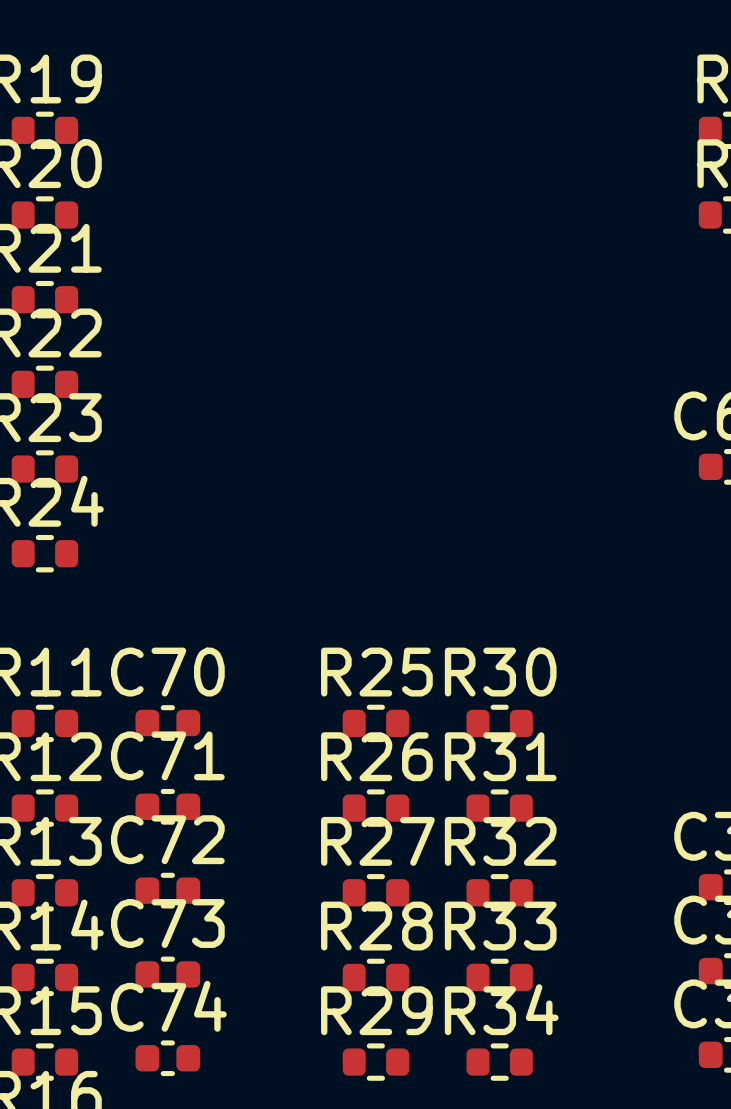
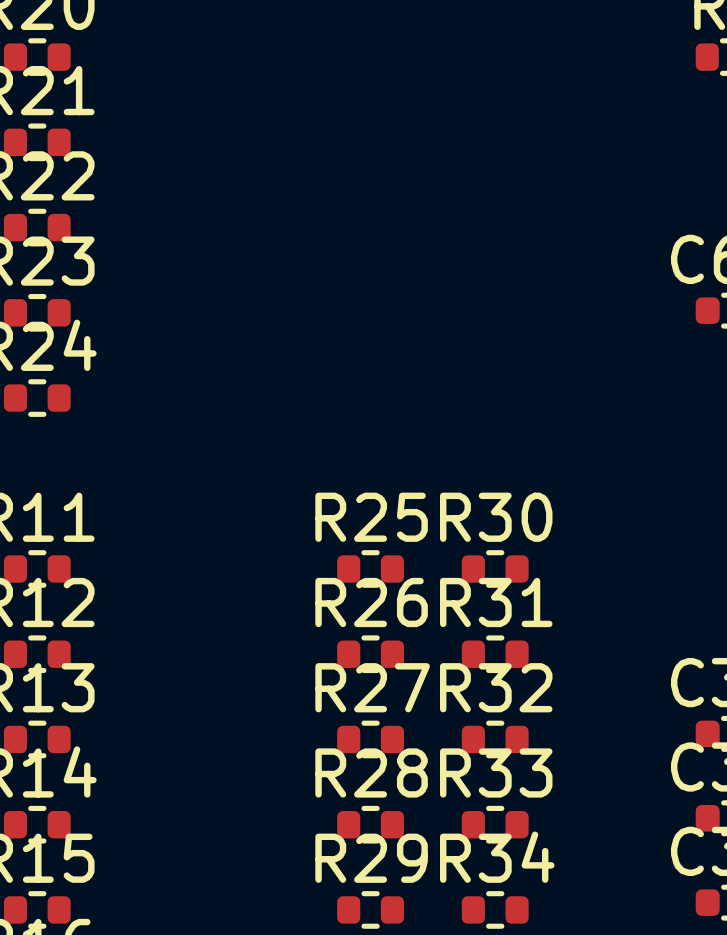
C70: (167, 723) -> none
C71: (167, 806) -> none
C72: (167, 890) -> none
C73: (167, 974) -> none
C74: (167, 1058) -> none

